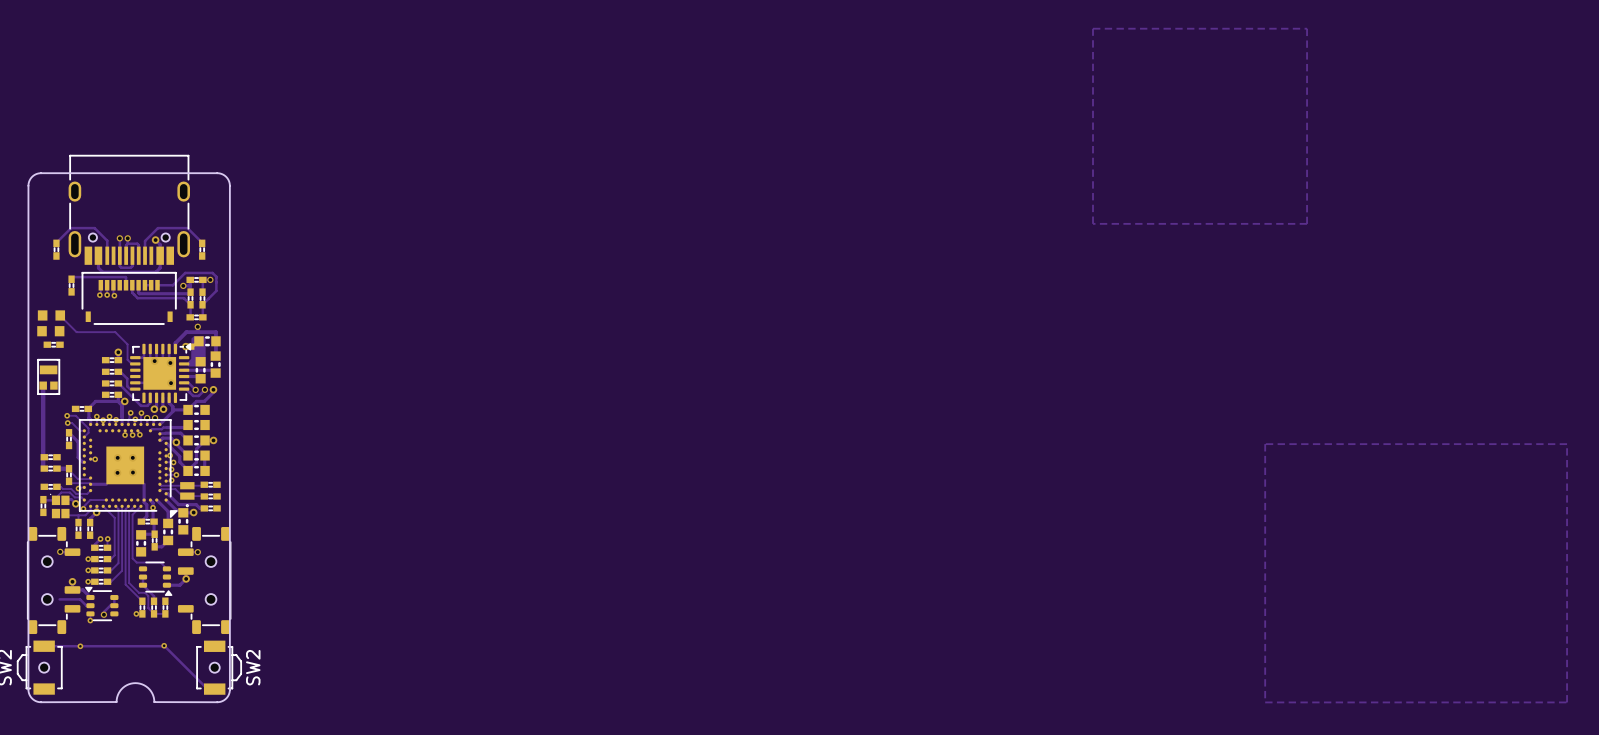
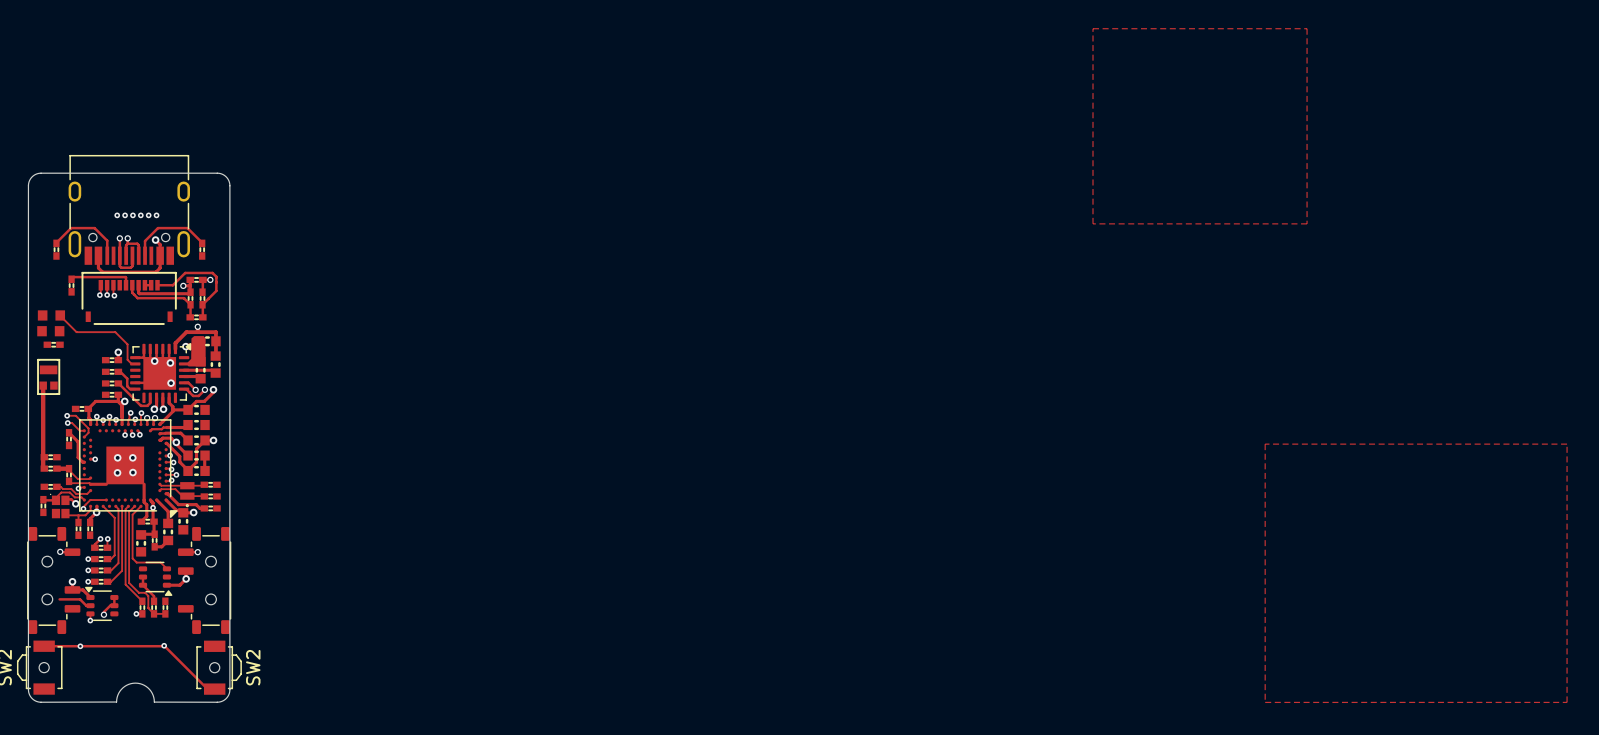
via: none -> (117, 215)
via: none -> (125, 215)
via: none -> (132, 215)
via: none -> (140, 215)
via: none -> (148, 215)
via: none -> (156, 215)

